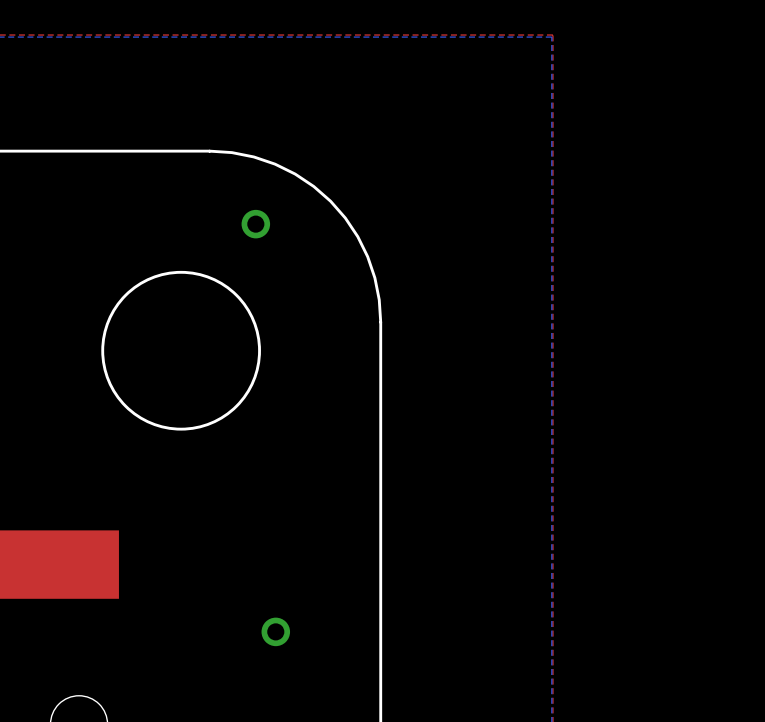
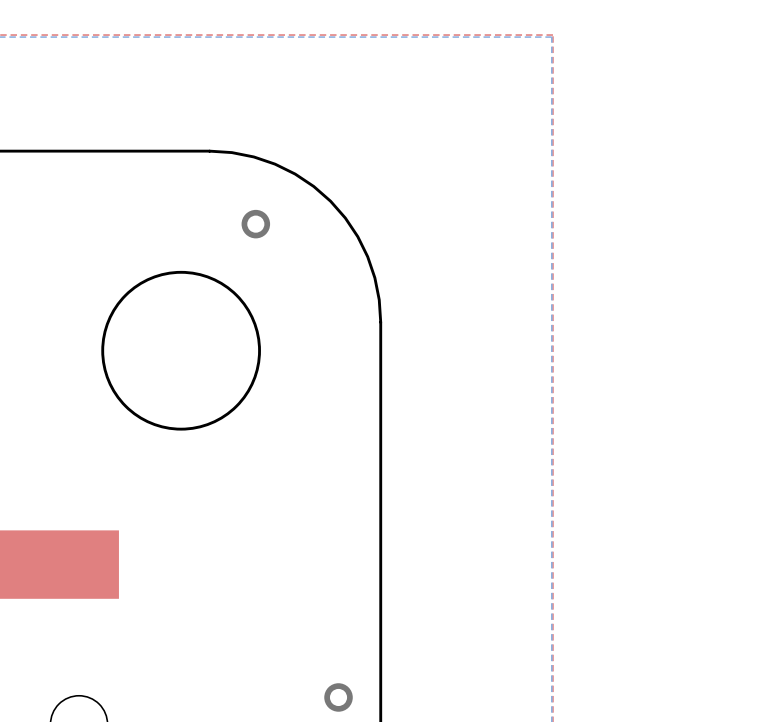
via position: (275, 631) -> (338, 697)

